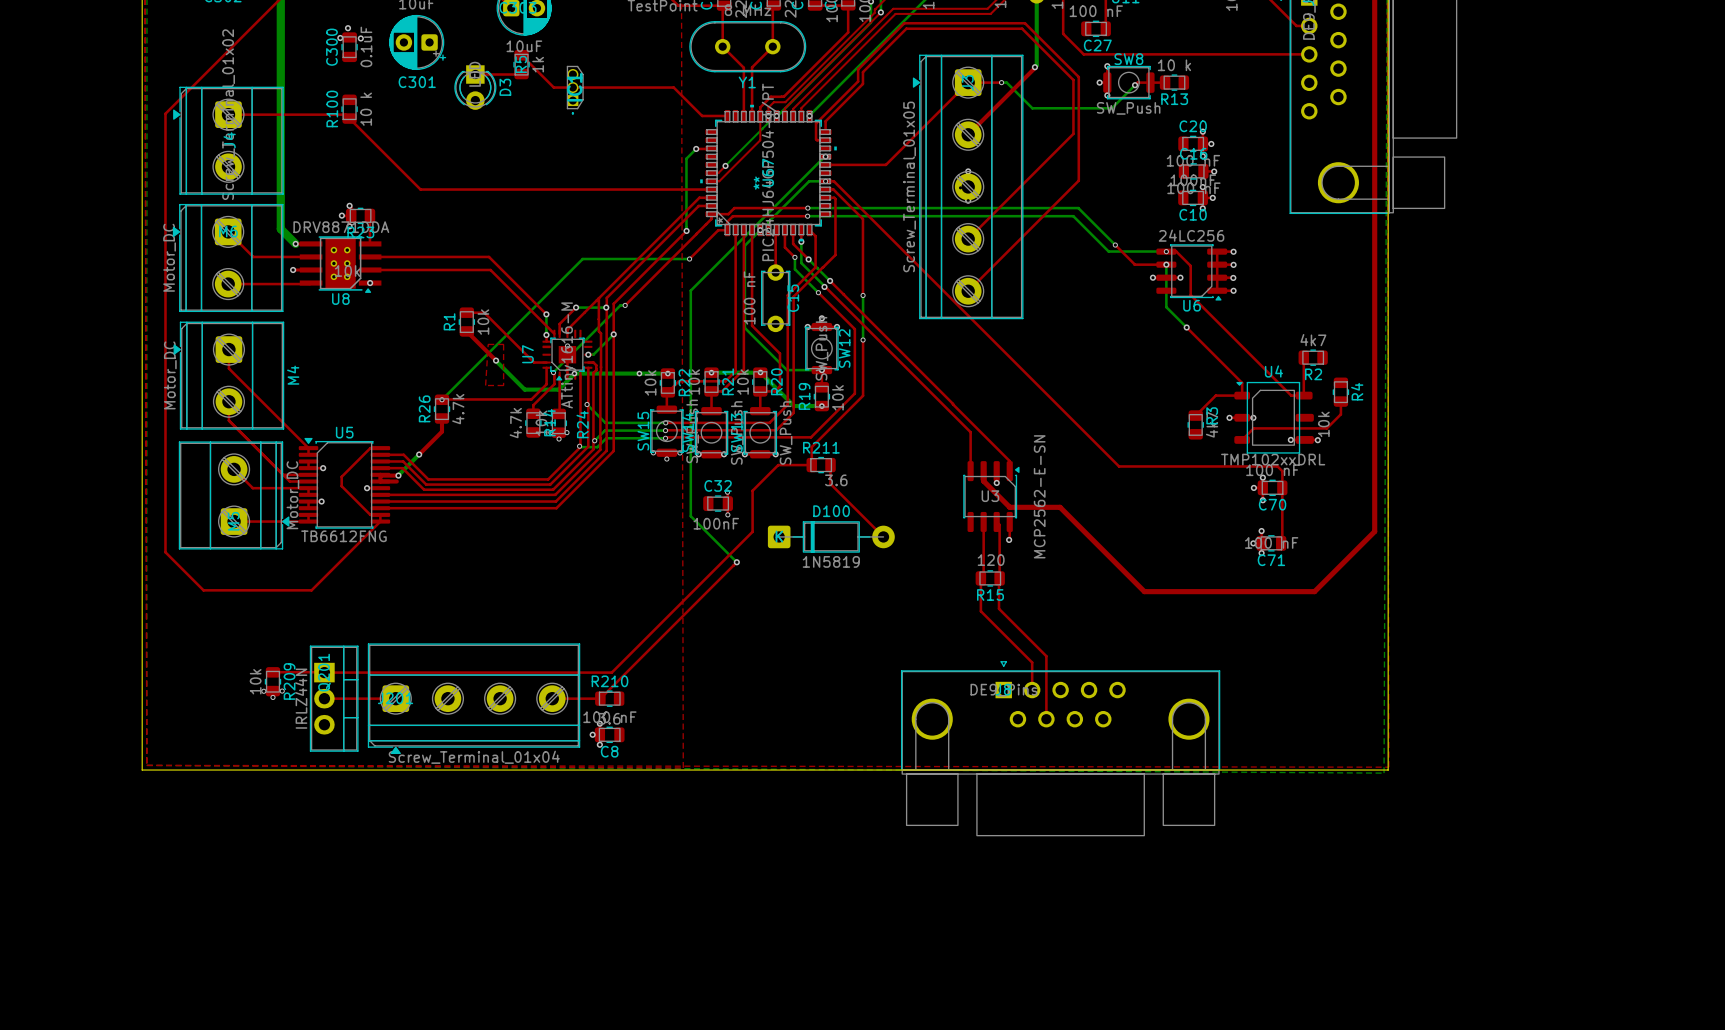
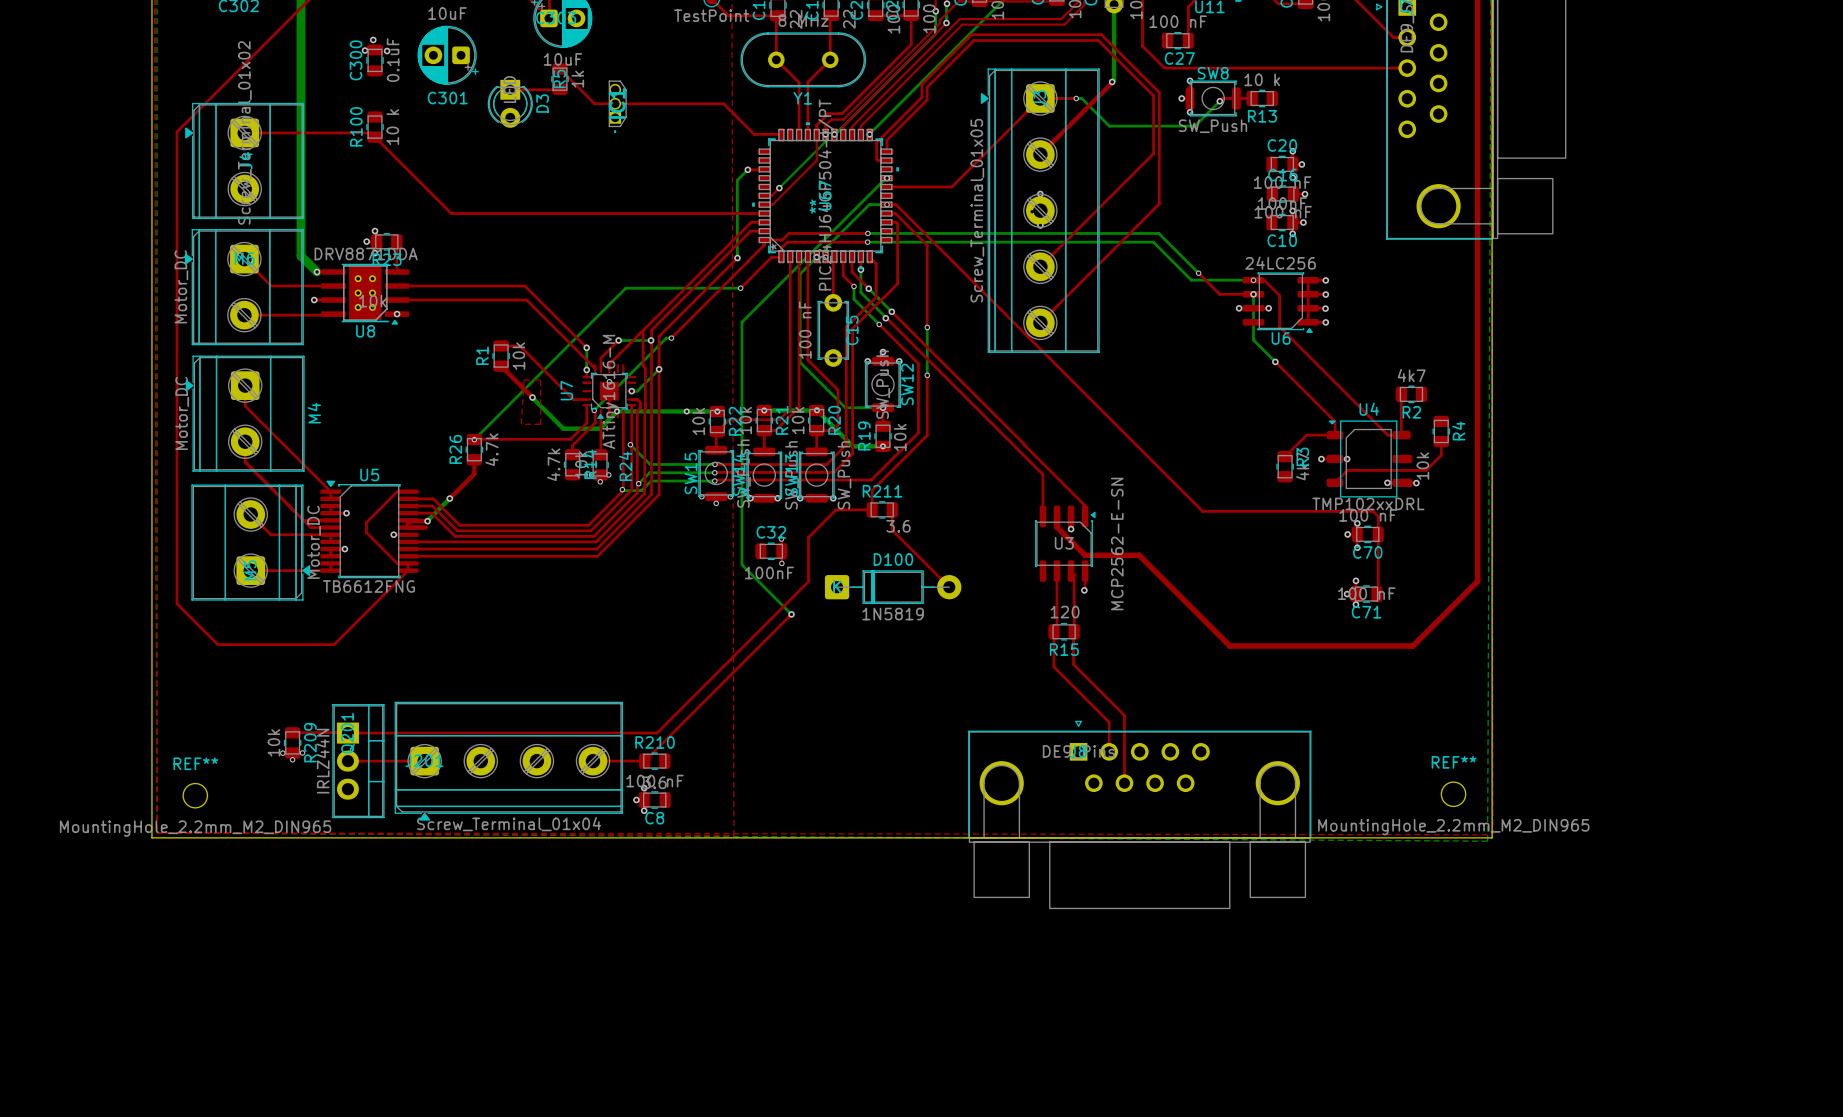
REF**: none -> MountingHole_2.2mm_M2_DIN965 (1453, 794)
REF**: none -> MountingHole_2.2mm_M2_DIN965 (195, 795)

